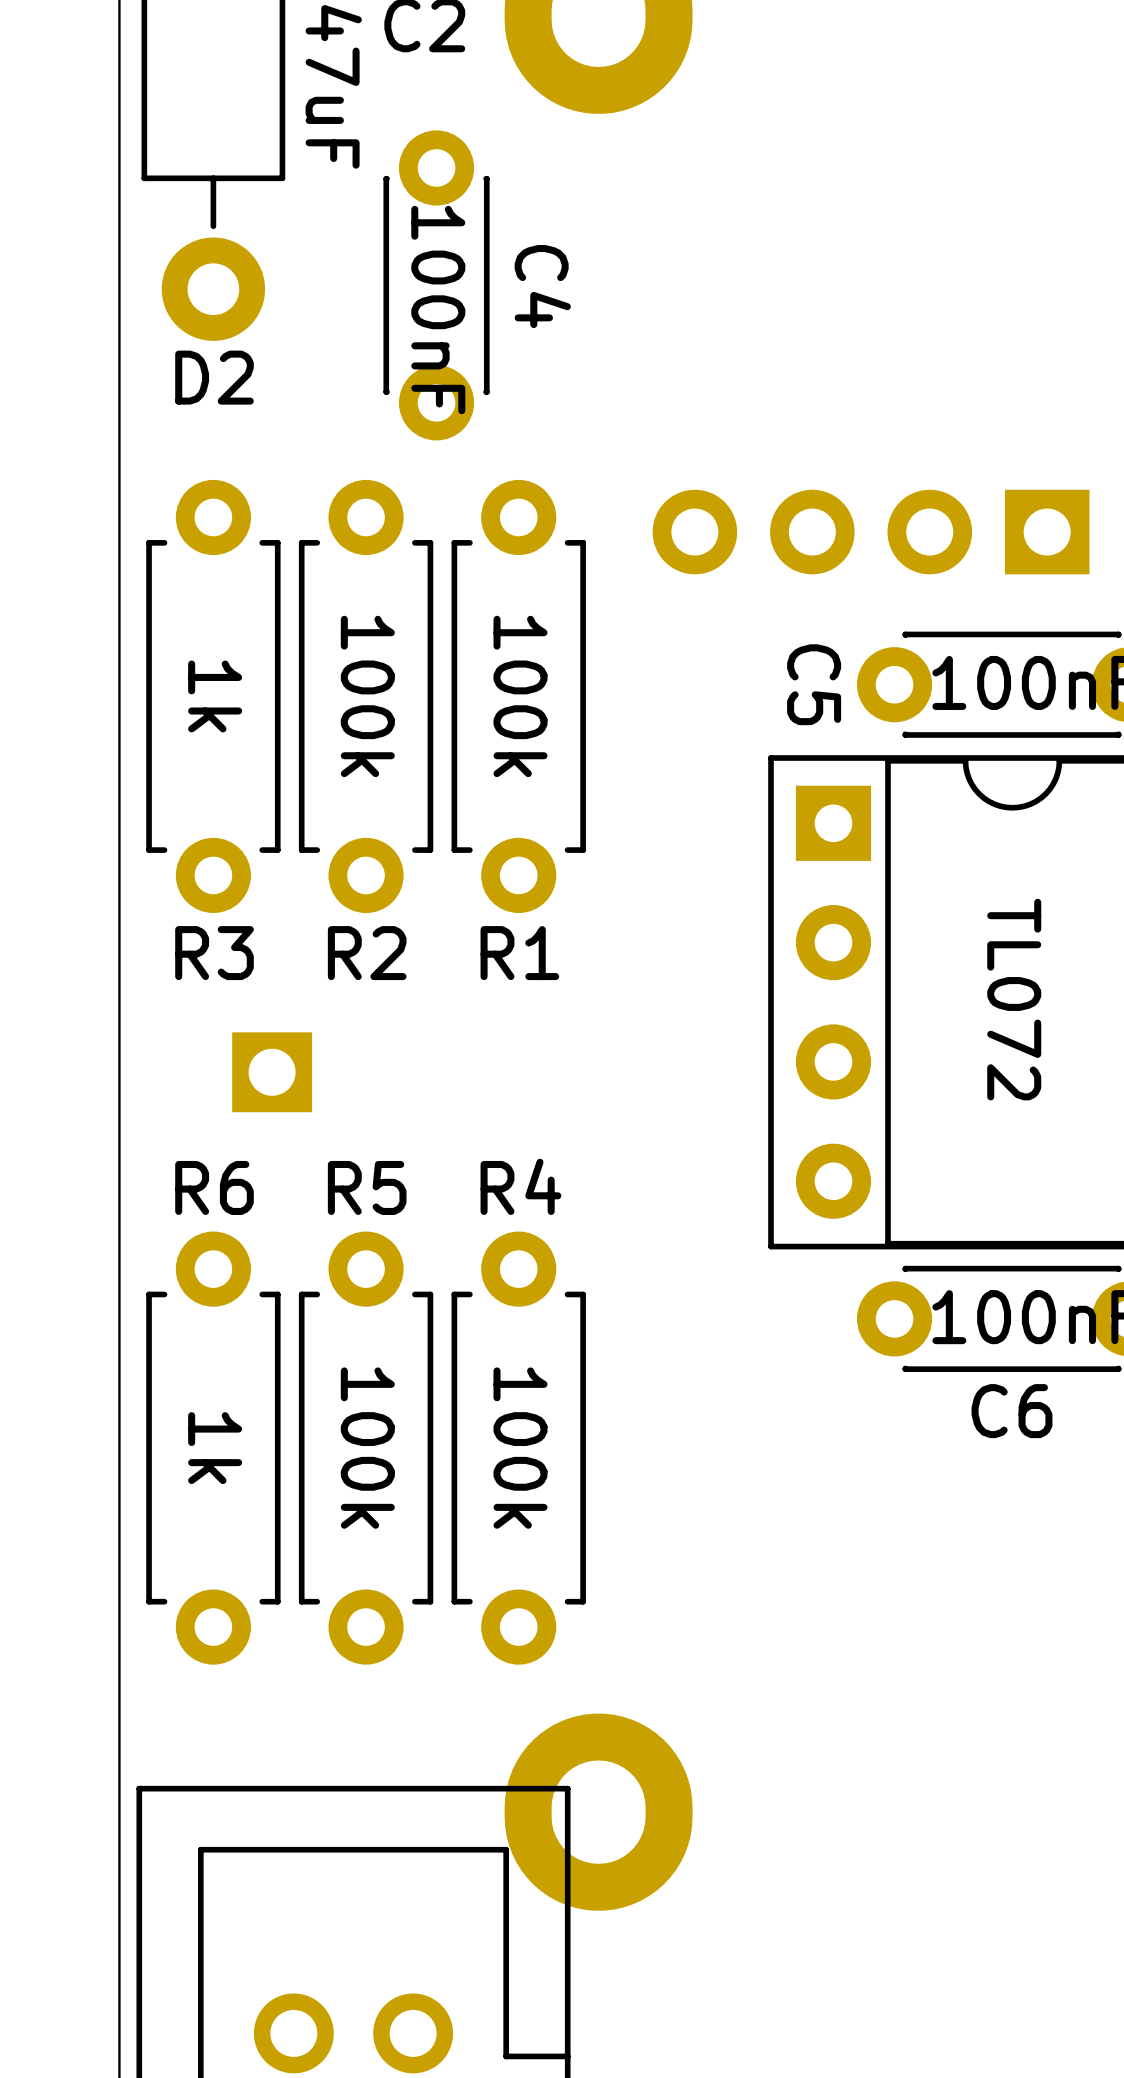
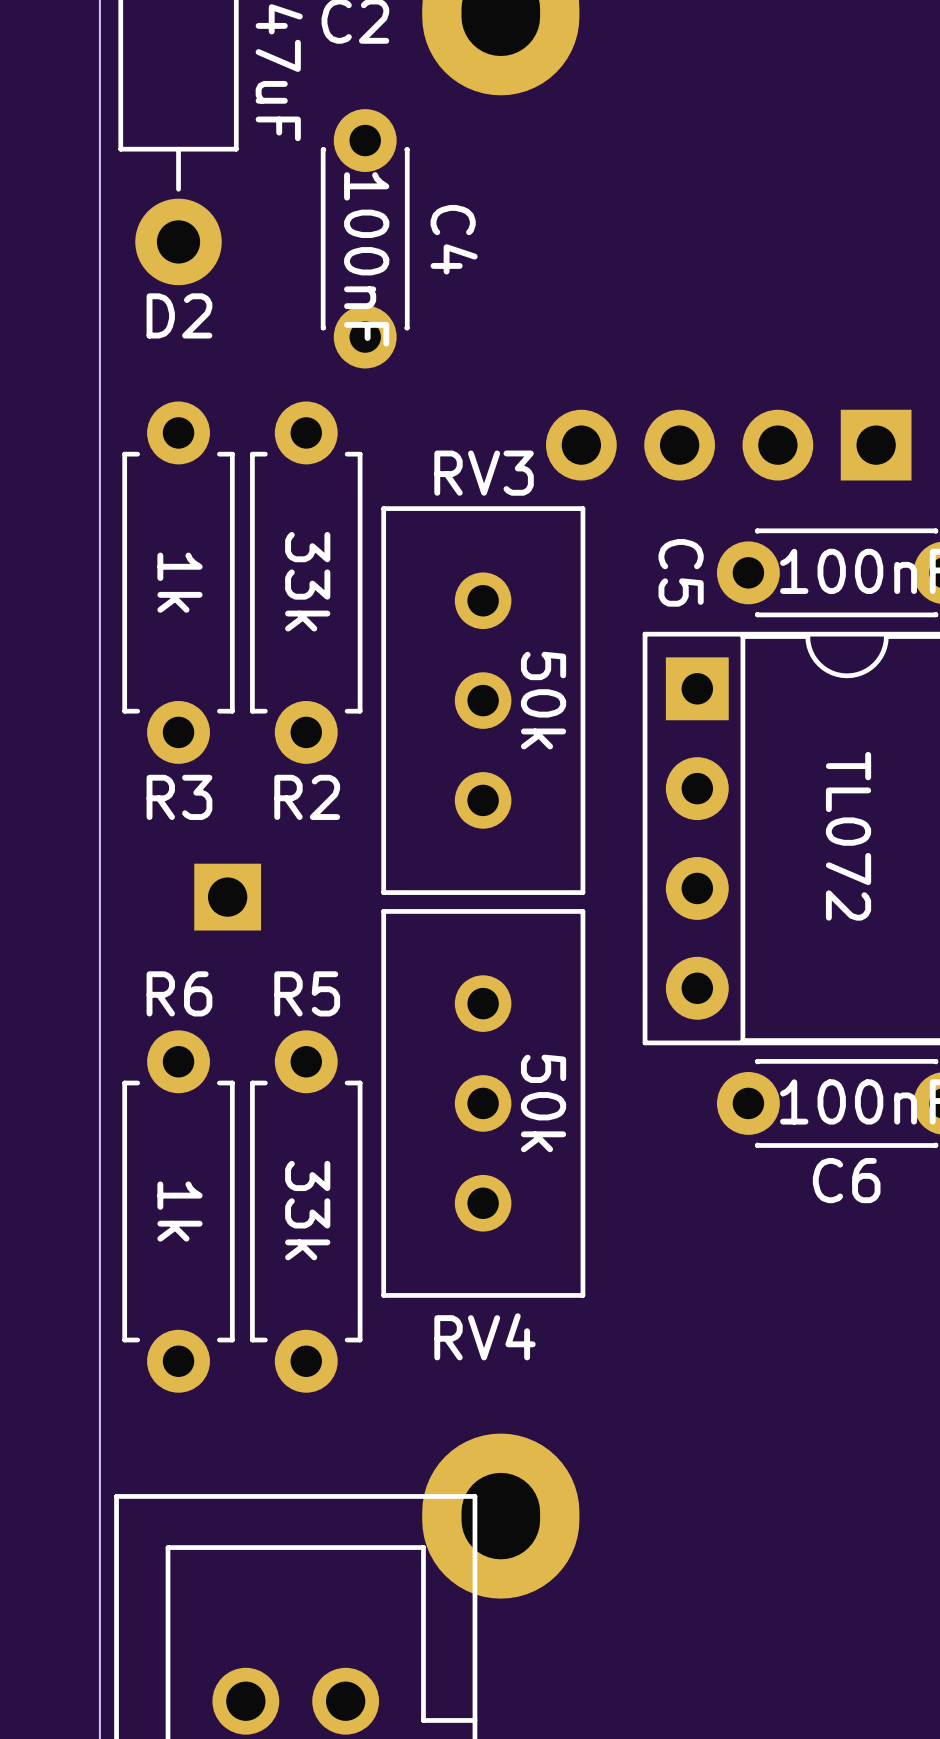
R2 value: 100k (367, 696) -> 33k (307, 581)
R1: 100k (518, 696) -> none
RV3: none -> 50k (483, 700)
RV4: none -> 50k (483, 1103)
R5 value: 100k (367, 1448) -> 33k (307, 1210)
R4: 100k (518, 1448) -> none

